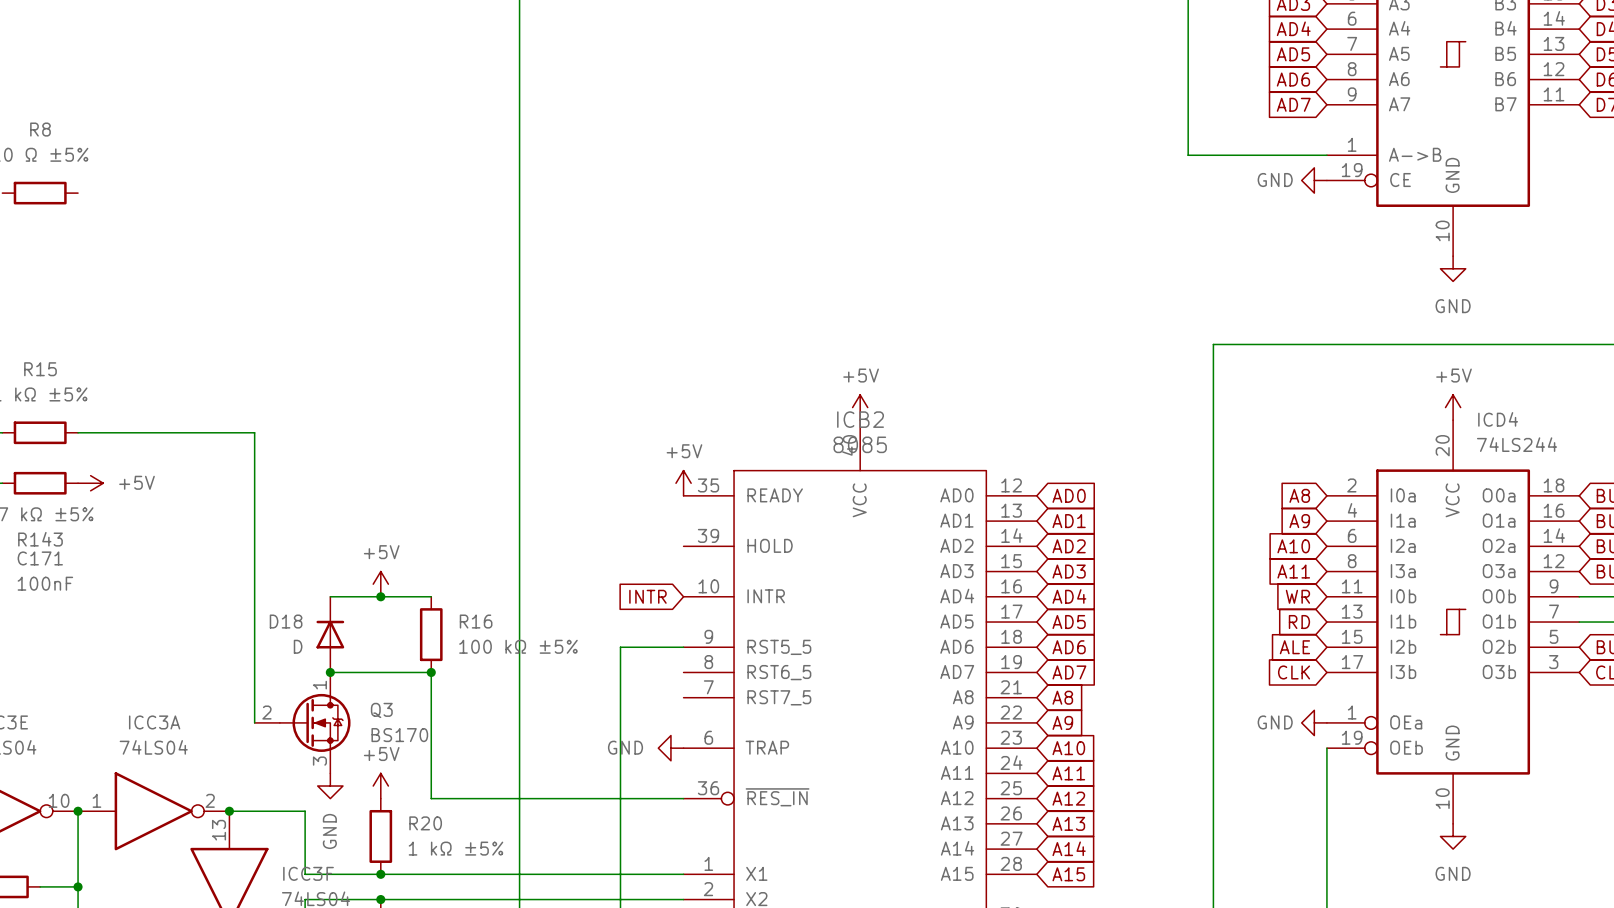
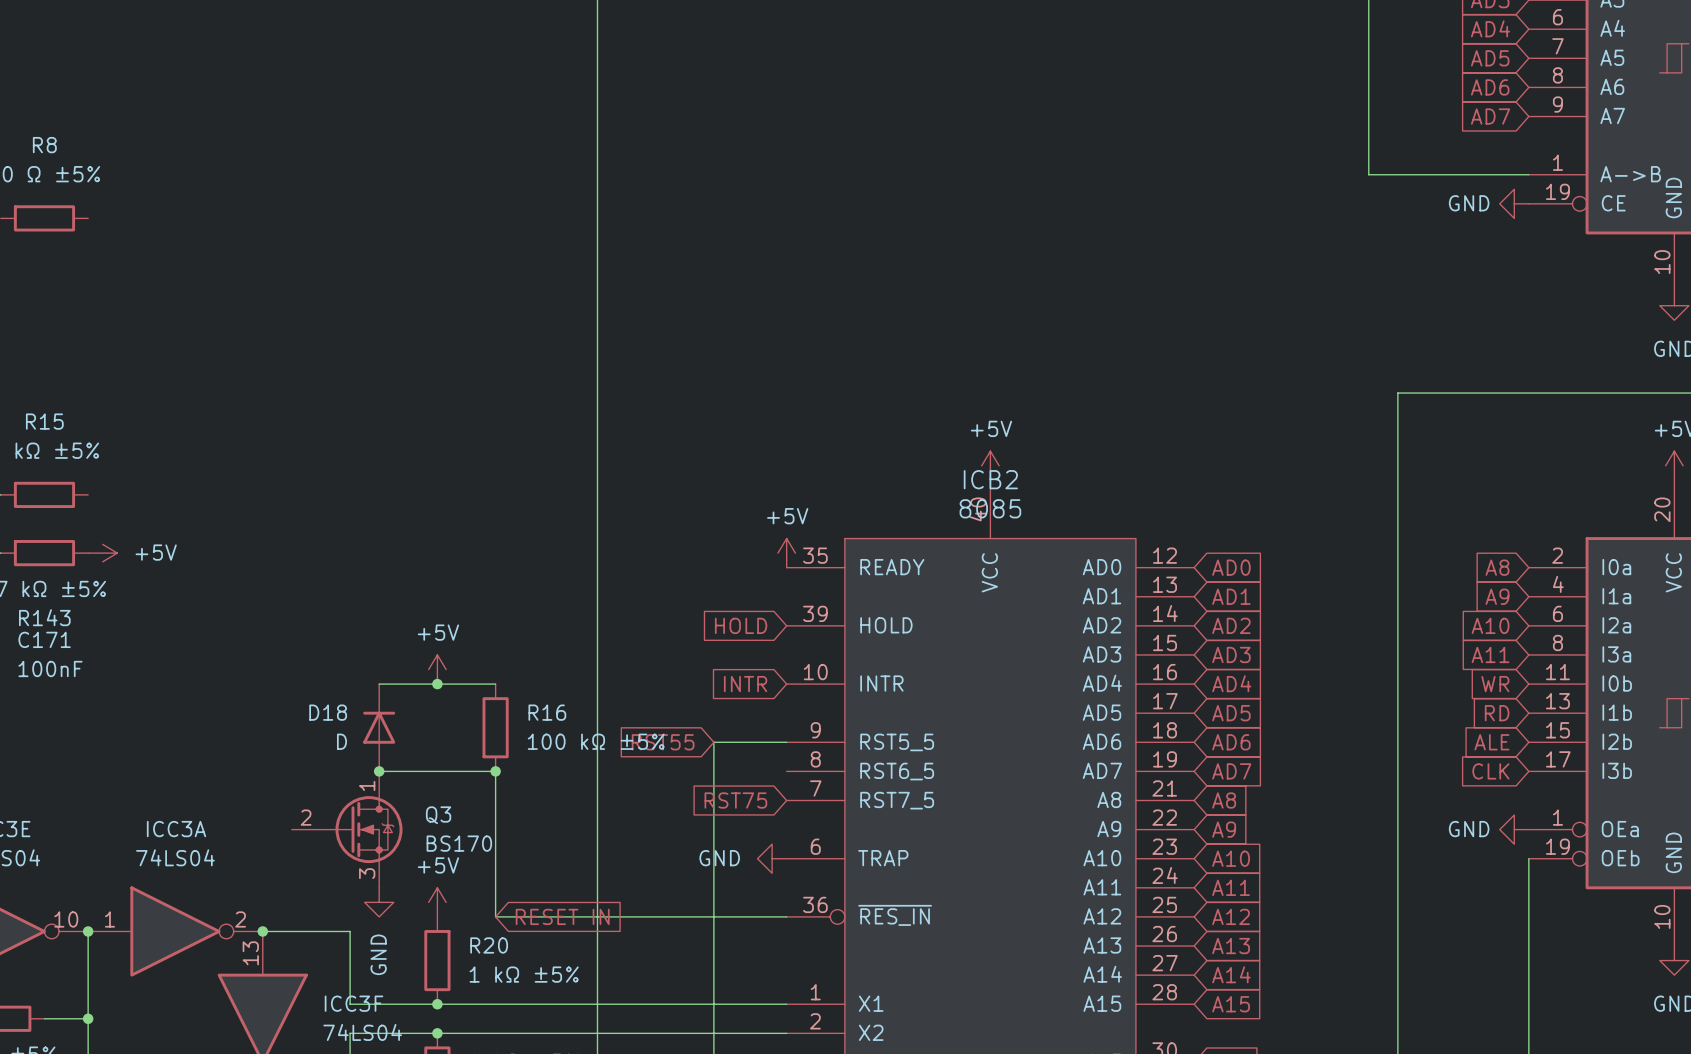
wire: (78, 432) (254, 432) (254, 722) -> none
global label: none -> HOLD (741, 625)
global label: none -> RST55 (663, 742)
global label: none -> RST75 (735, 800)
global label: none -> RESET IN (562, 916)

